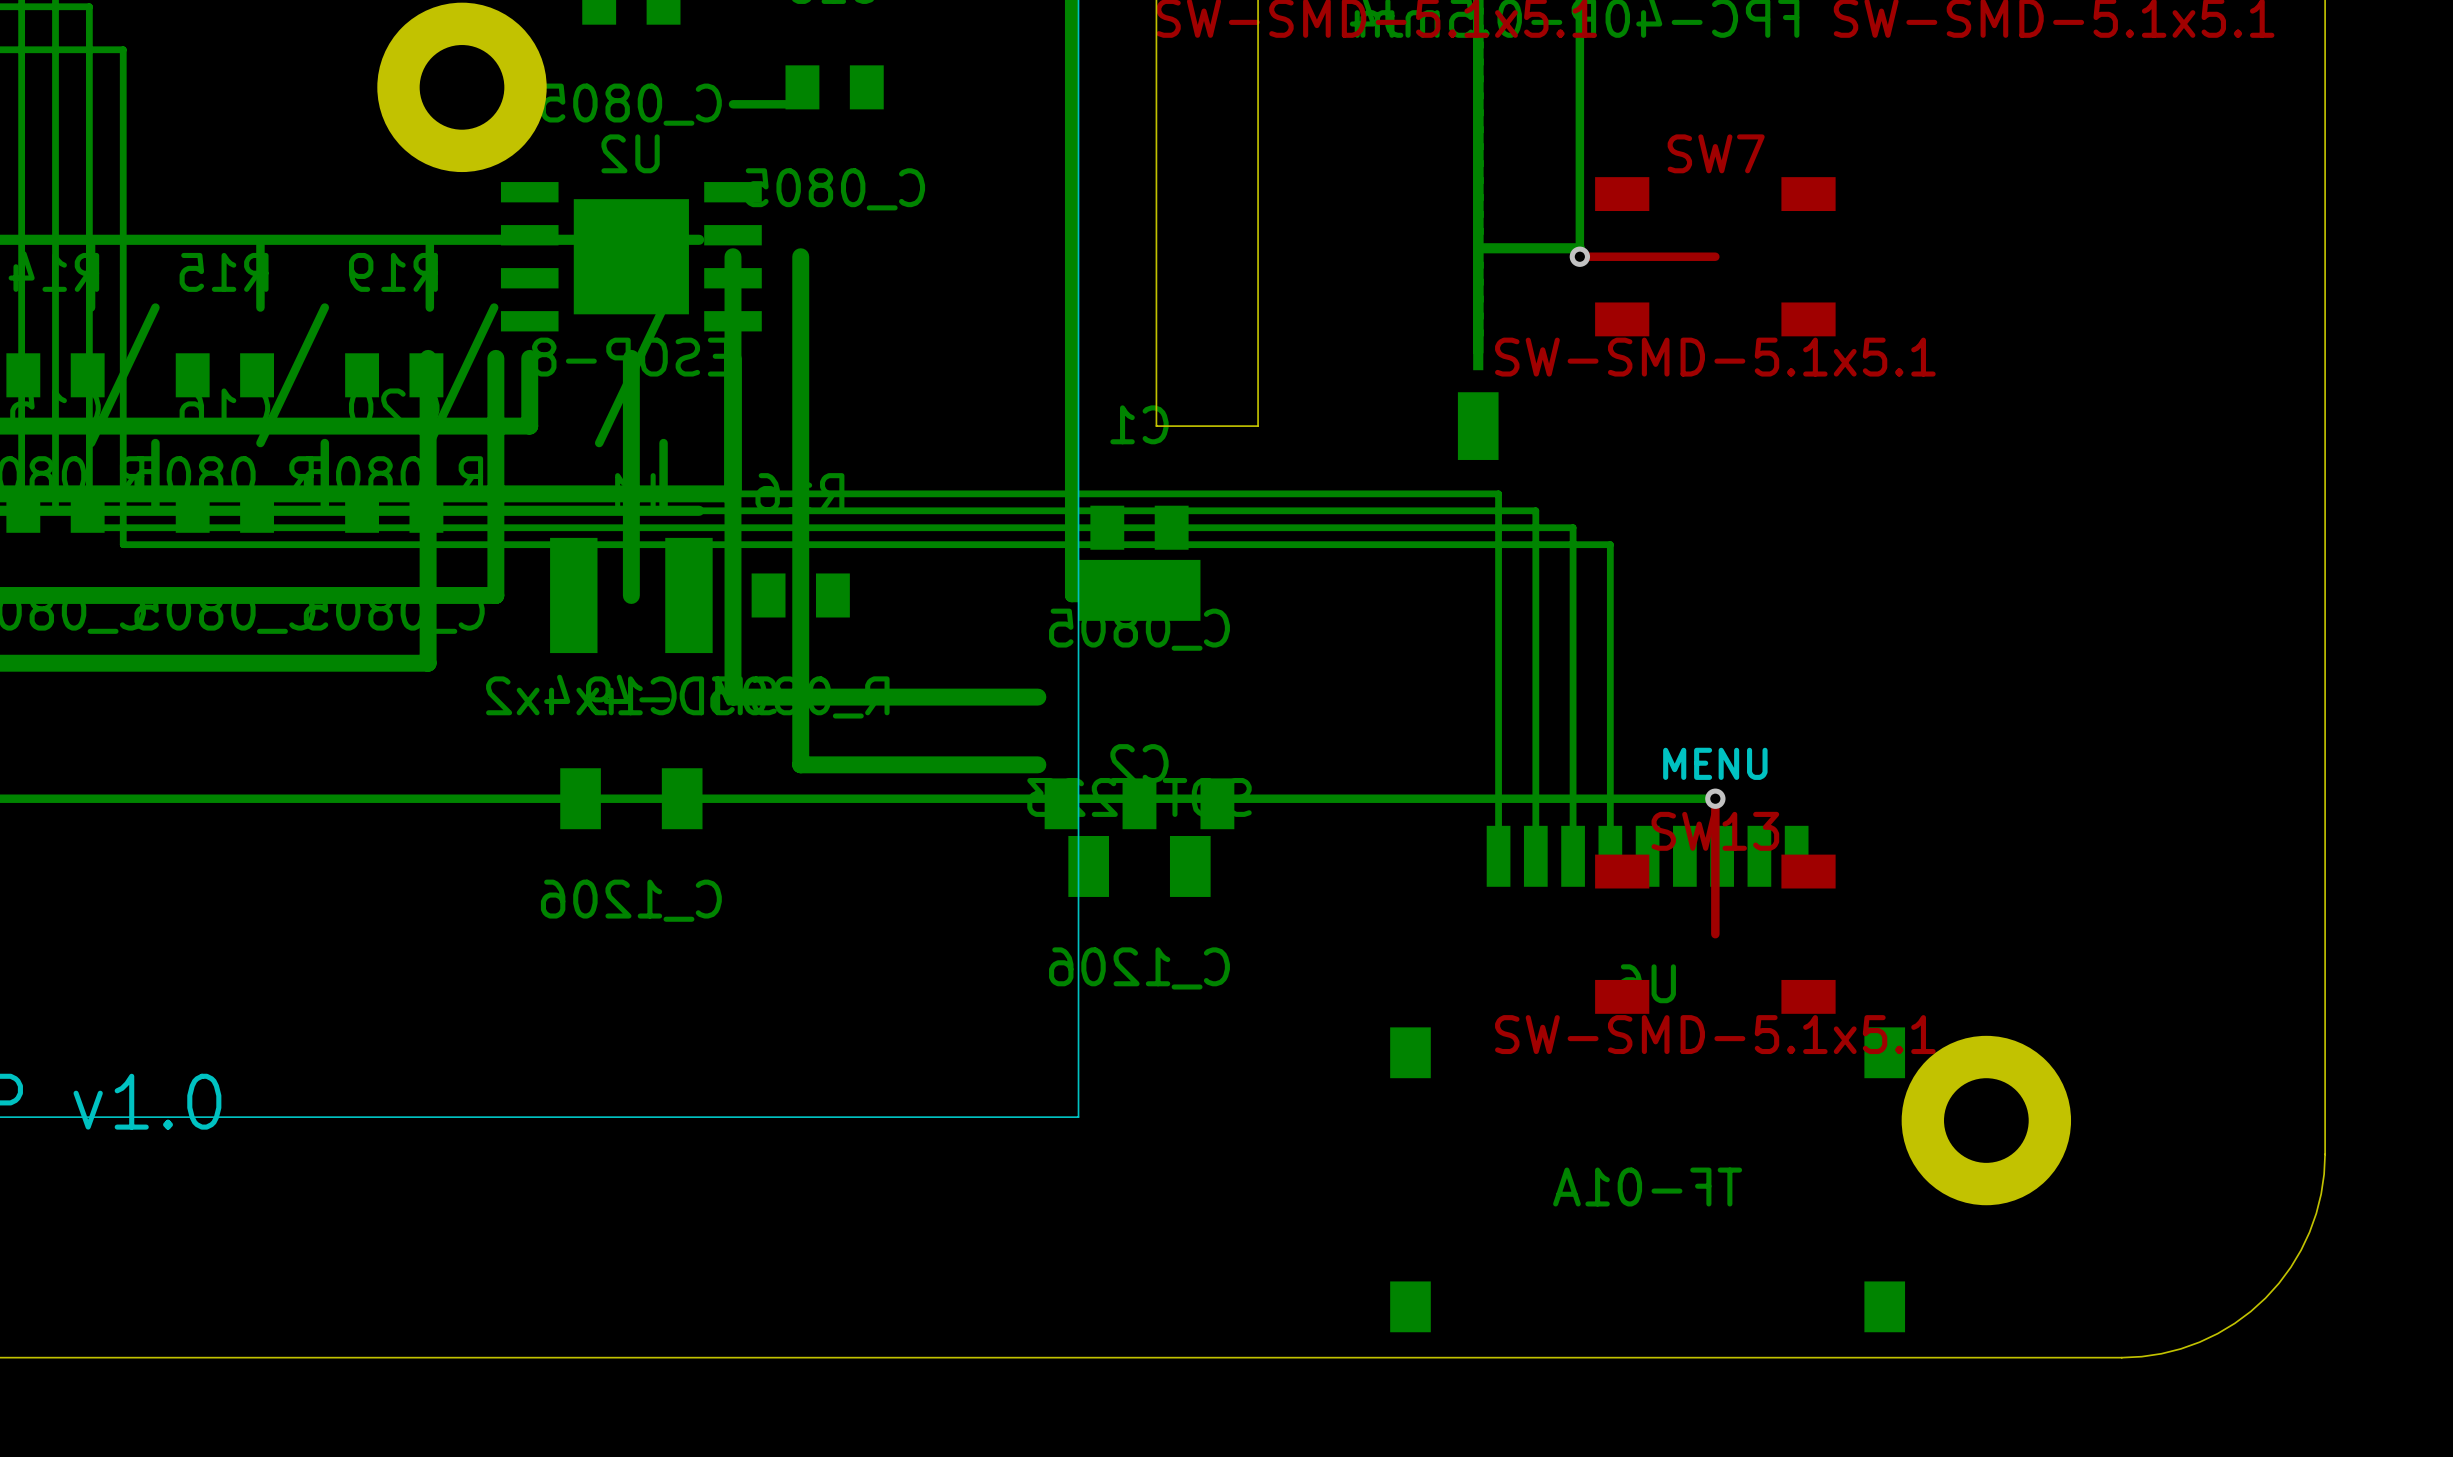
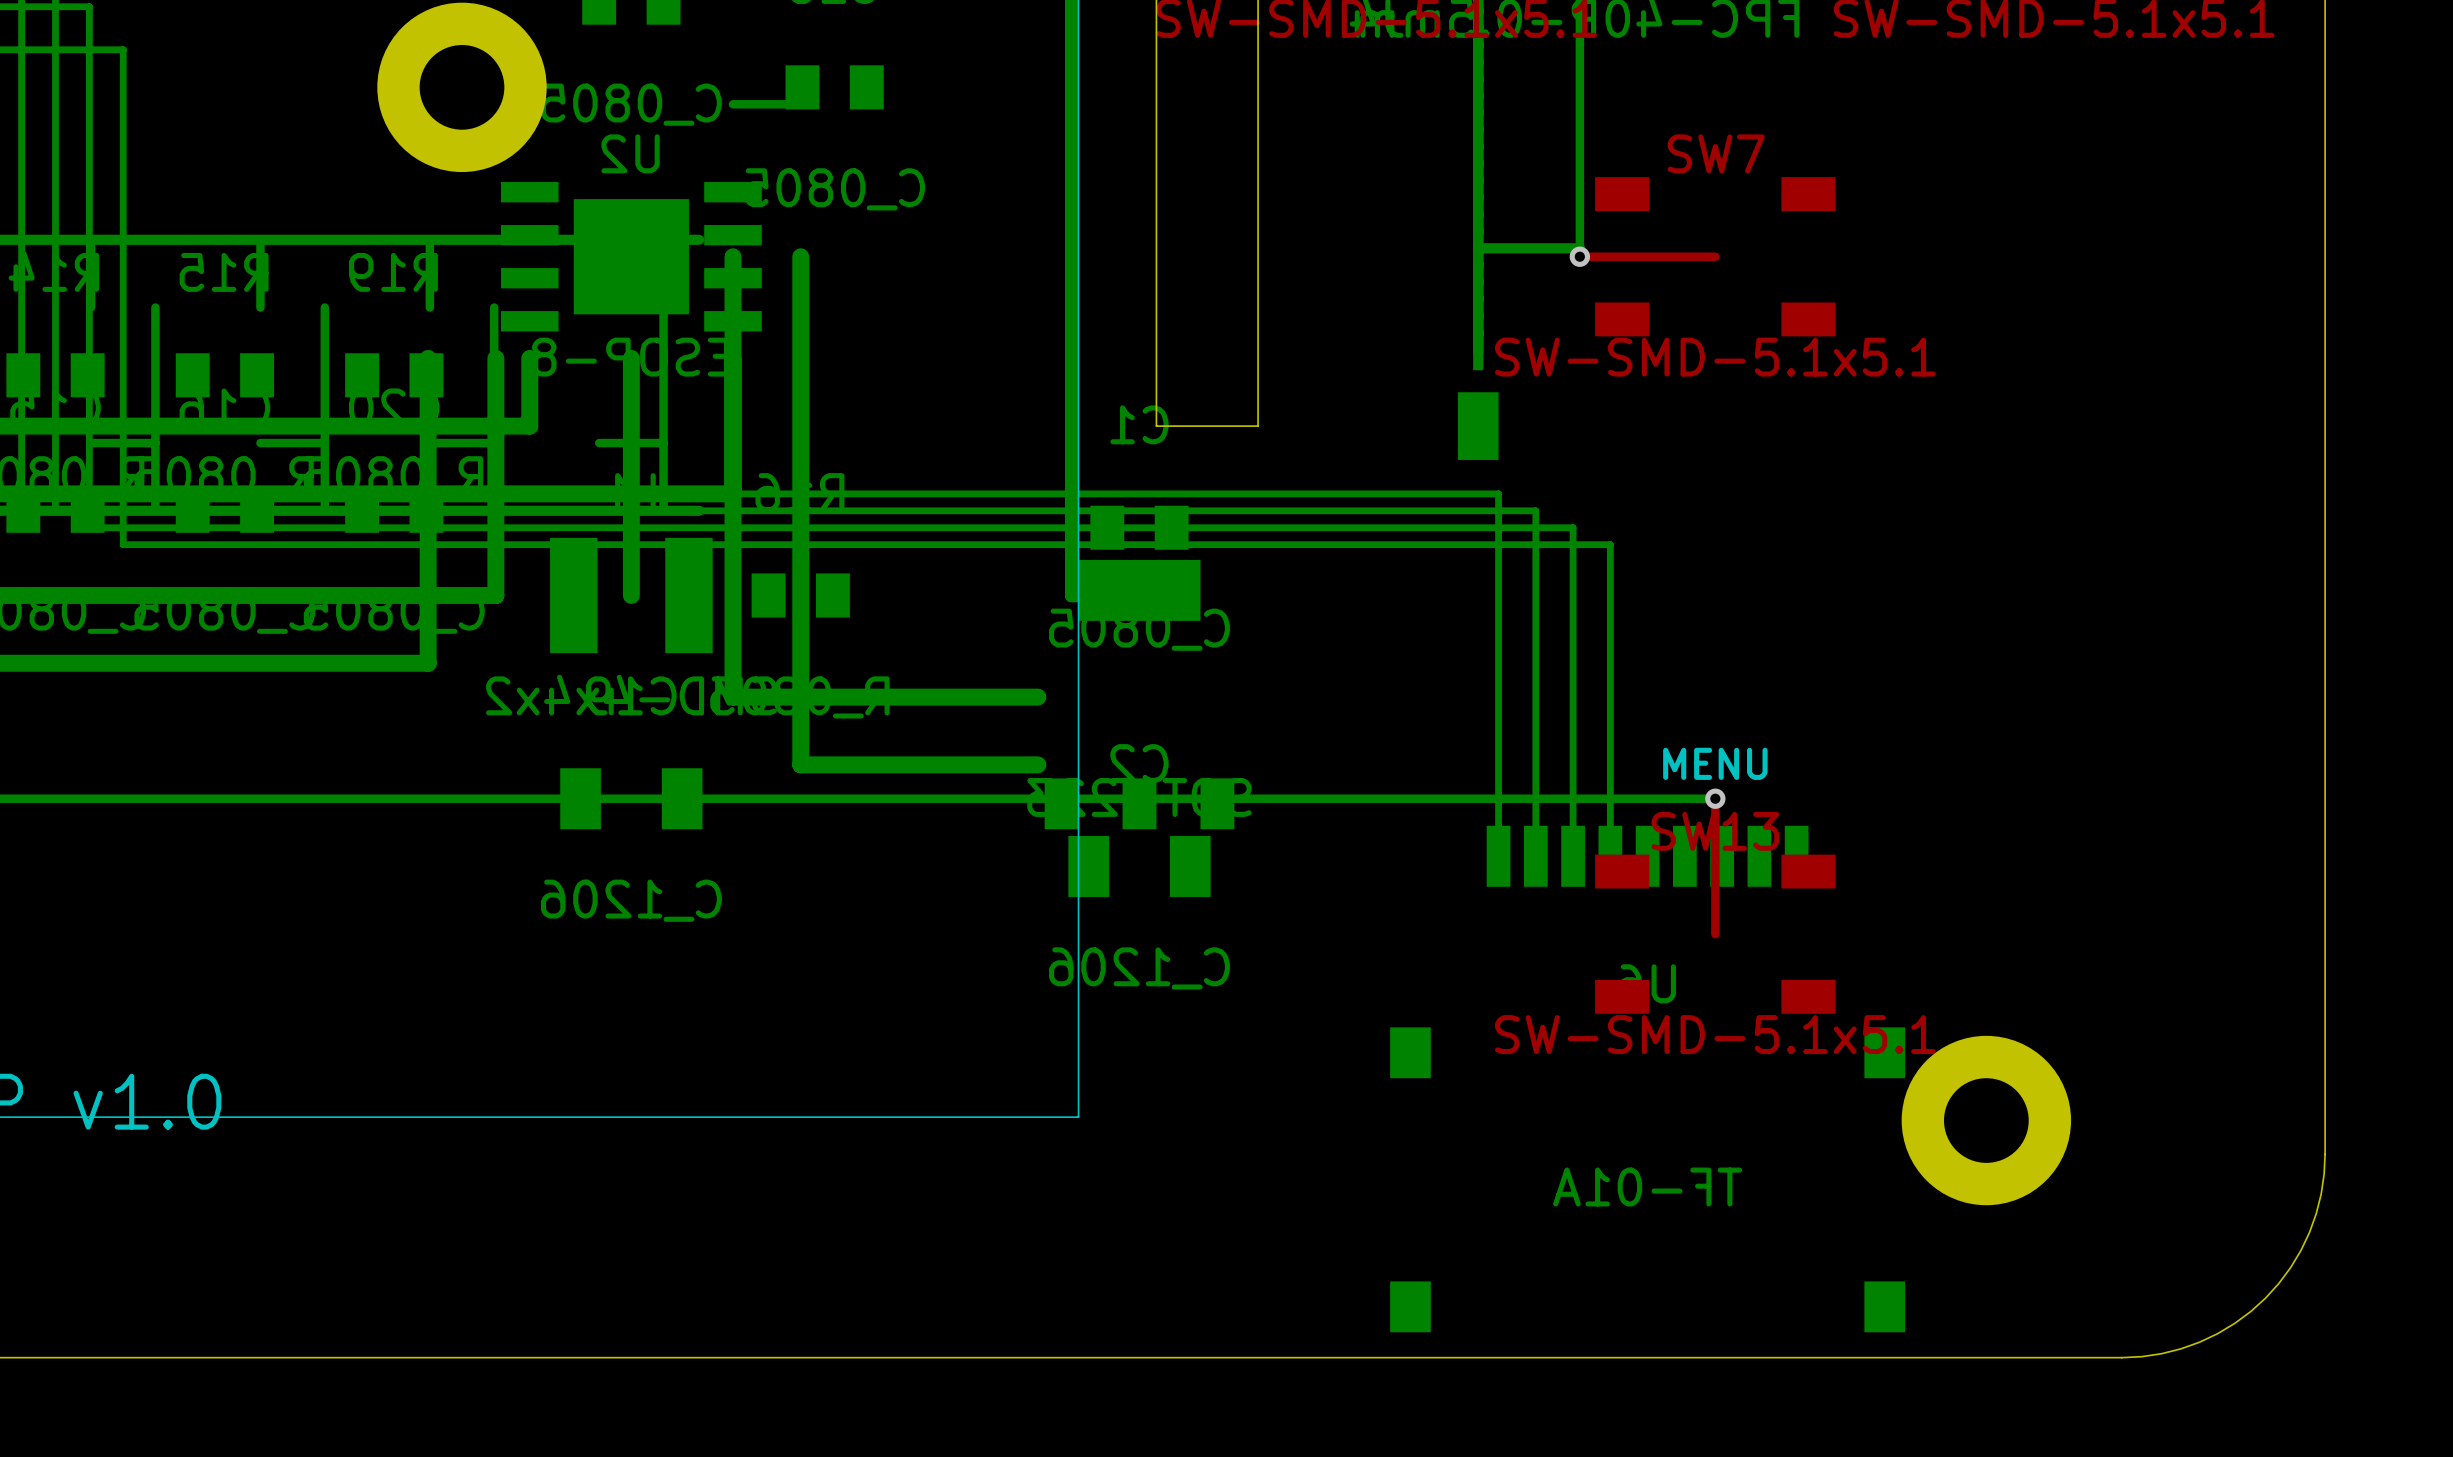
bottom track: (155, 307) (91, 443) -> (155, 307) (155, 443) (91, 443)
bottom track: (324, 307) (260, 443) -> (324, 307) (324, 443) (260, 443)
bottom track: (494, 307) (429, 443) -> (494, 307) (494, 443) (429, 443)
bottom track: (663, 307) (599, 443) -> (663, 307) (663, 443) (599, 443)

